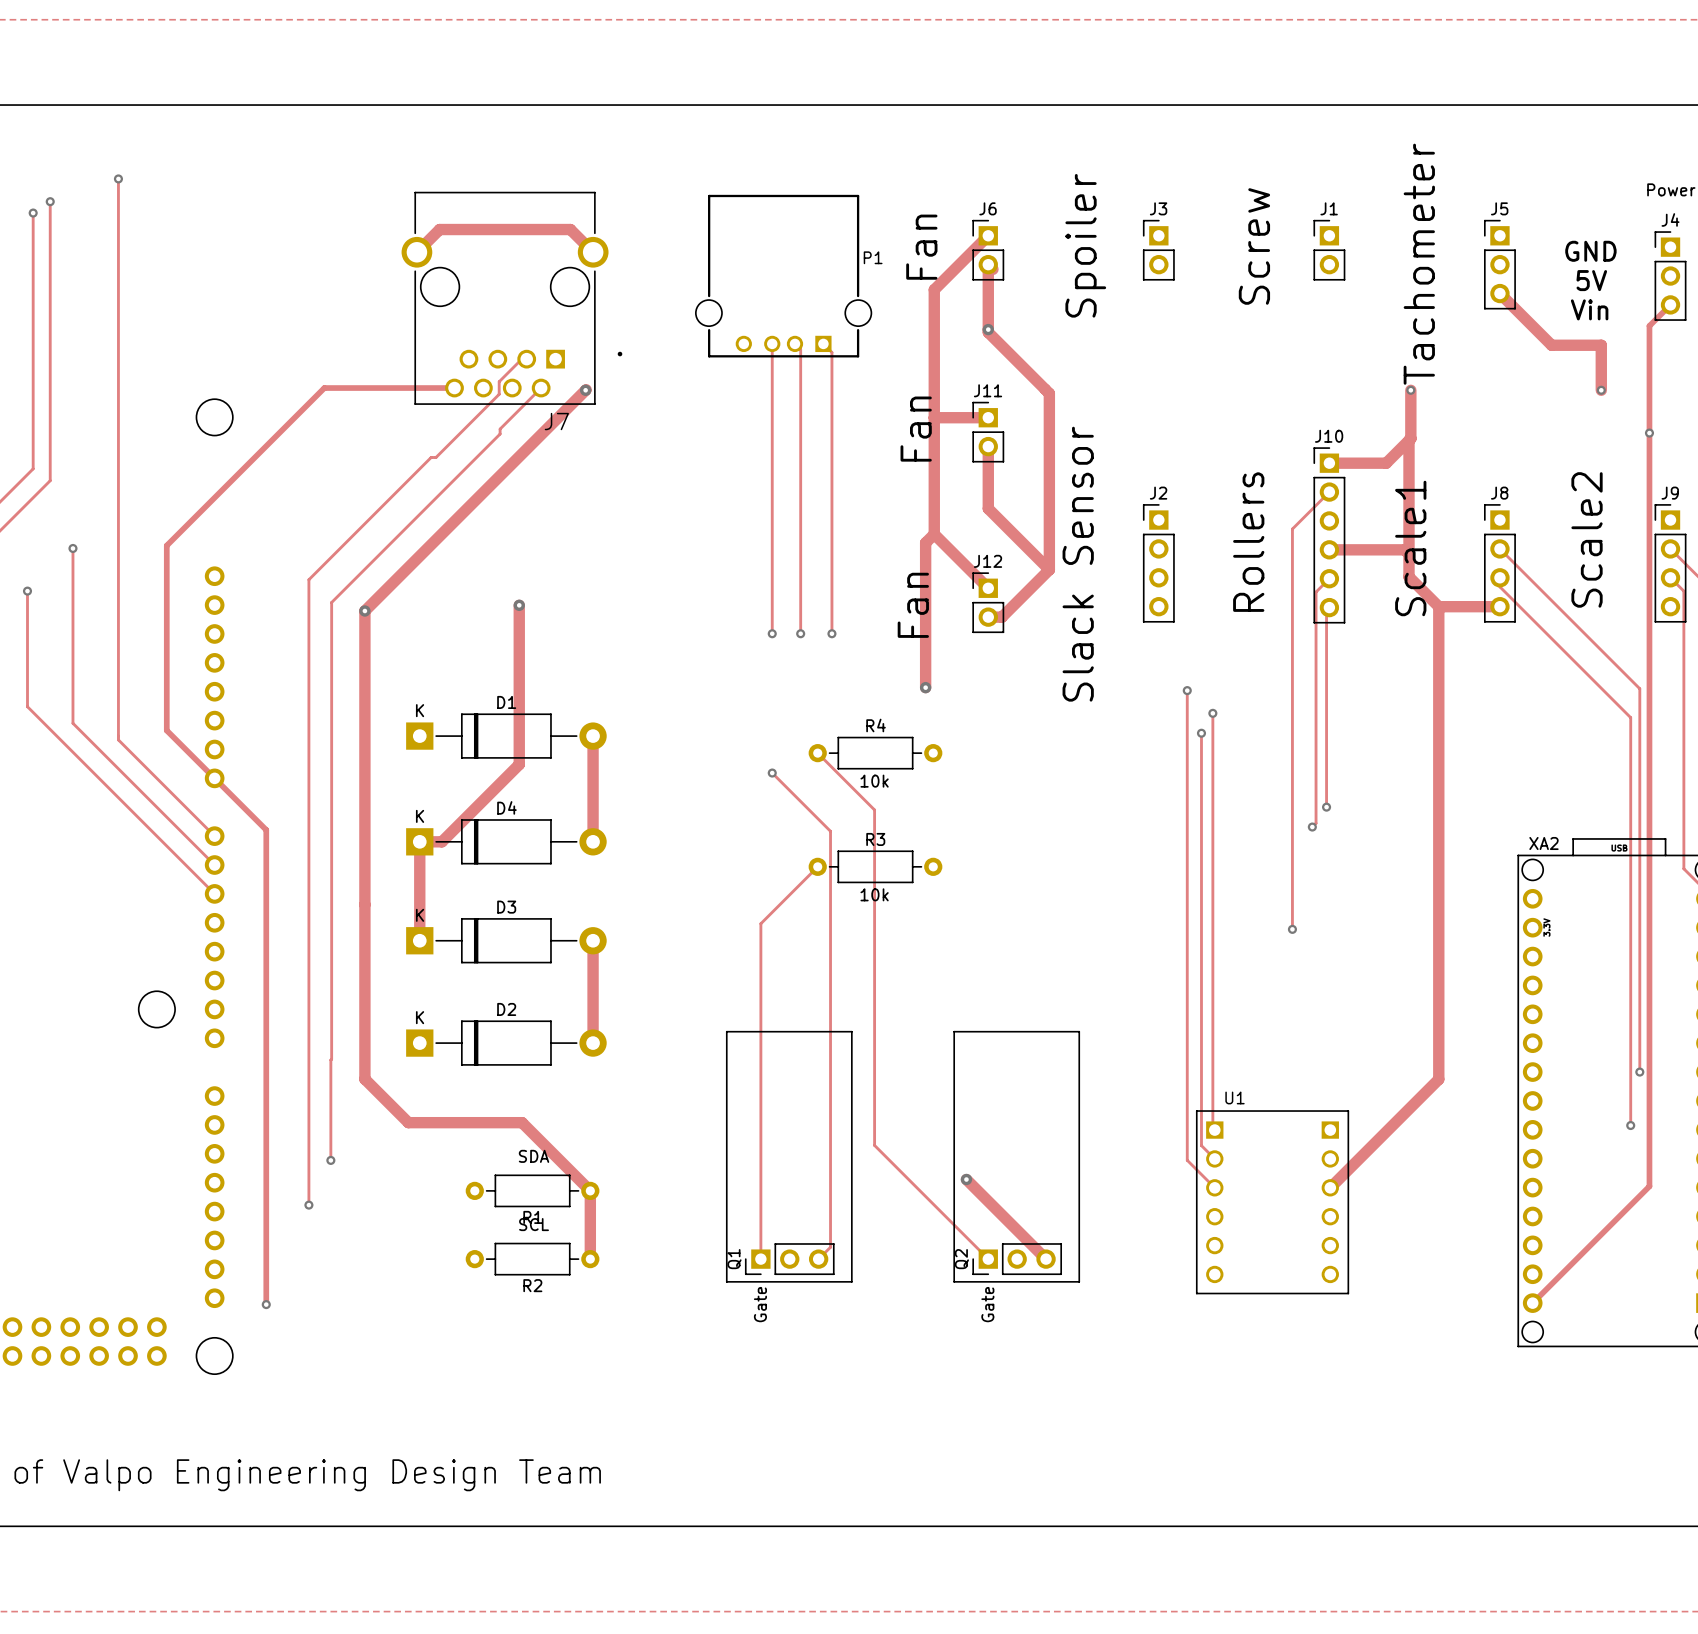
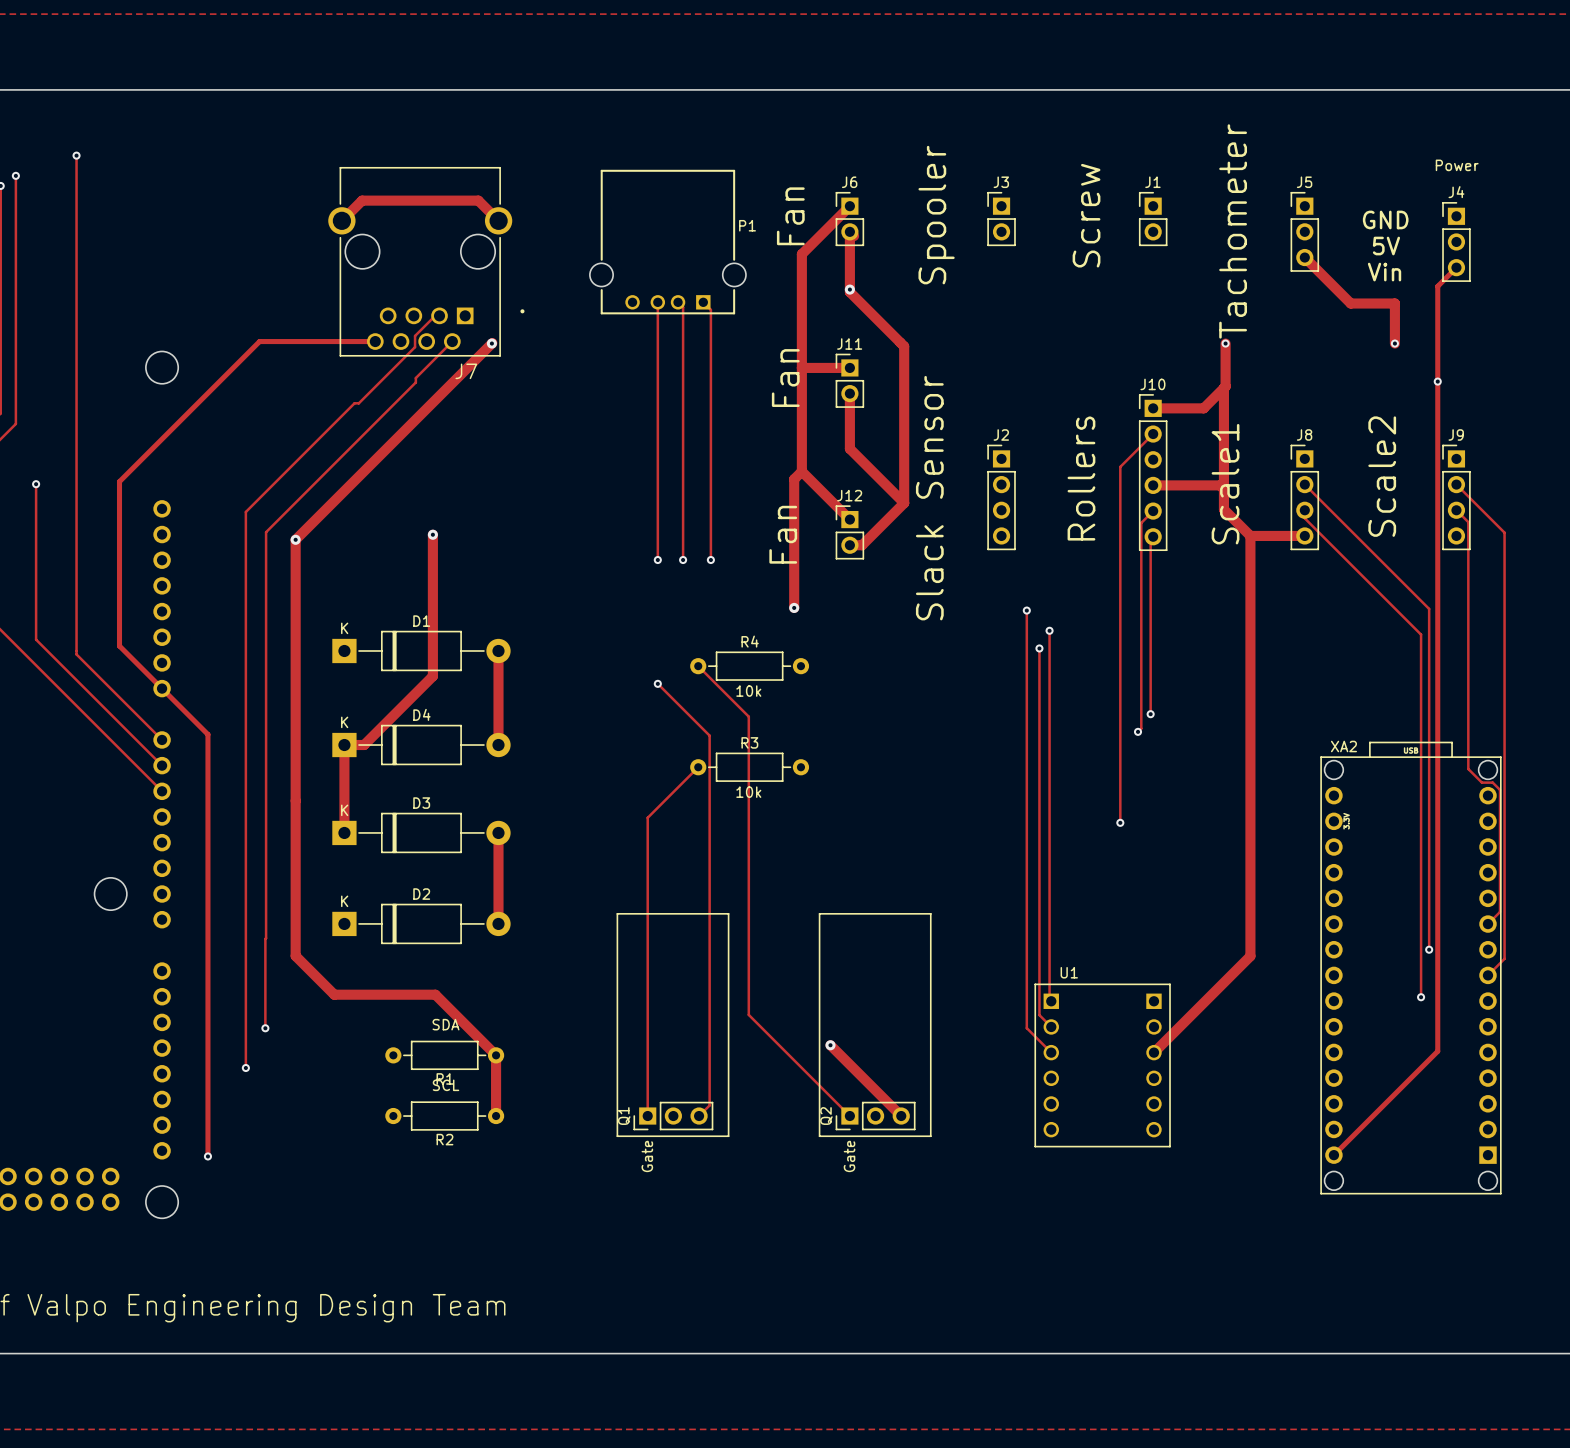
text: Spoiler (1085, 245) -> Spooler (936, 215)

